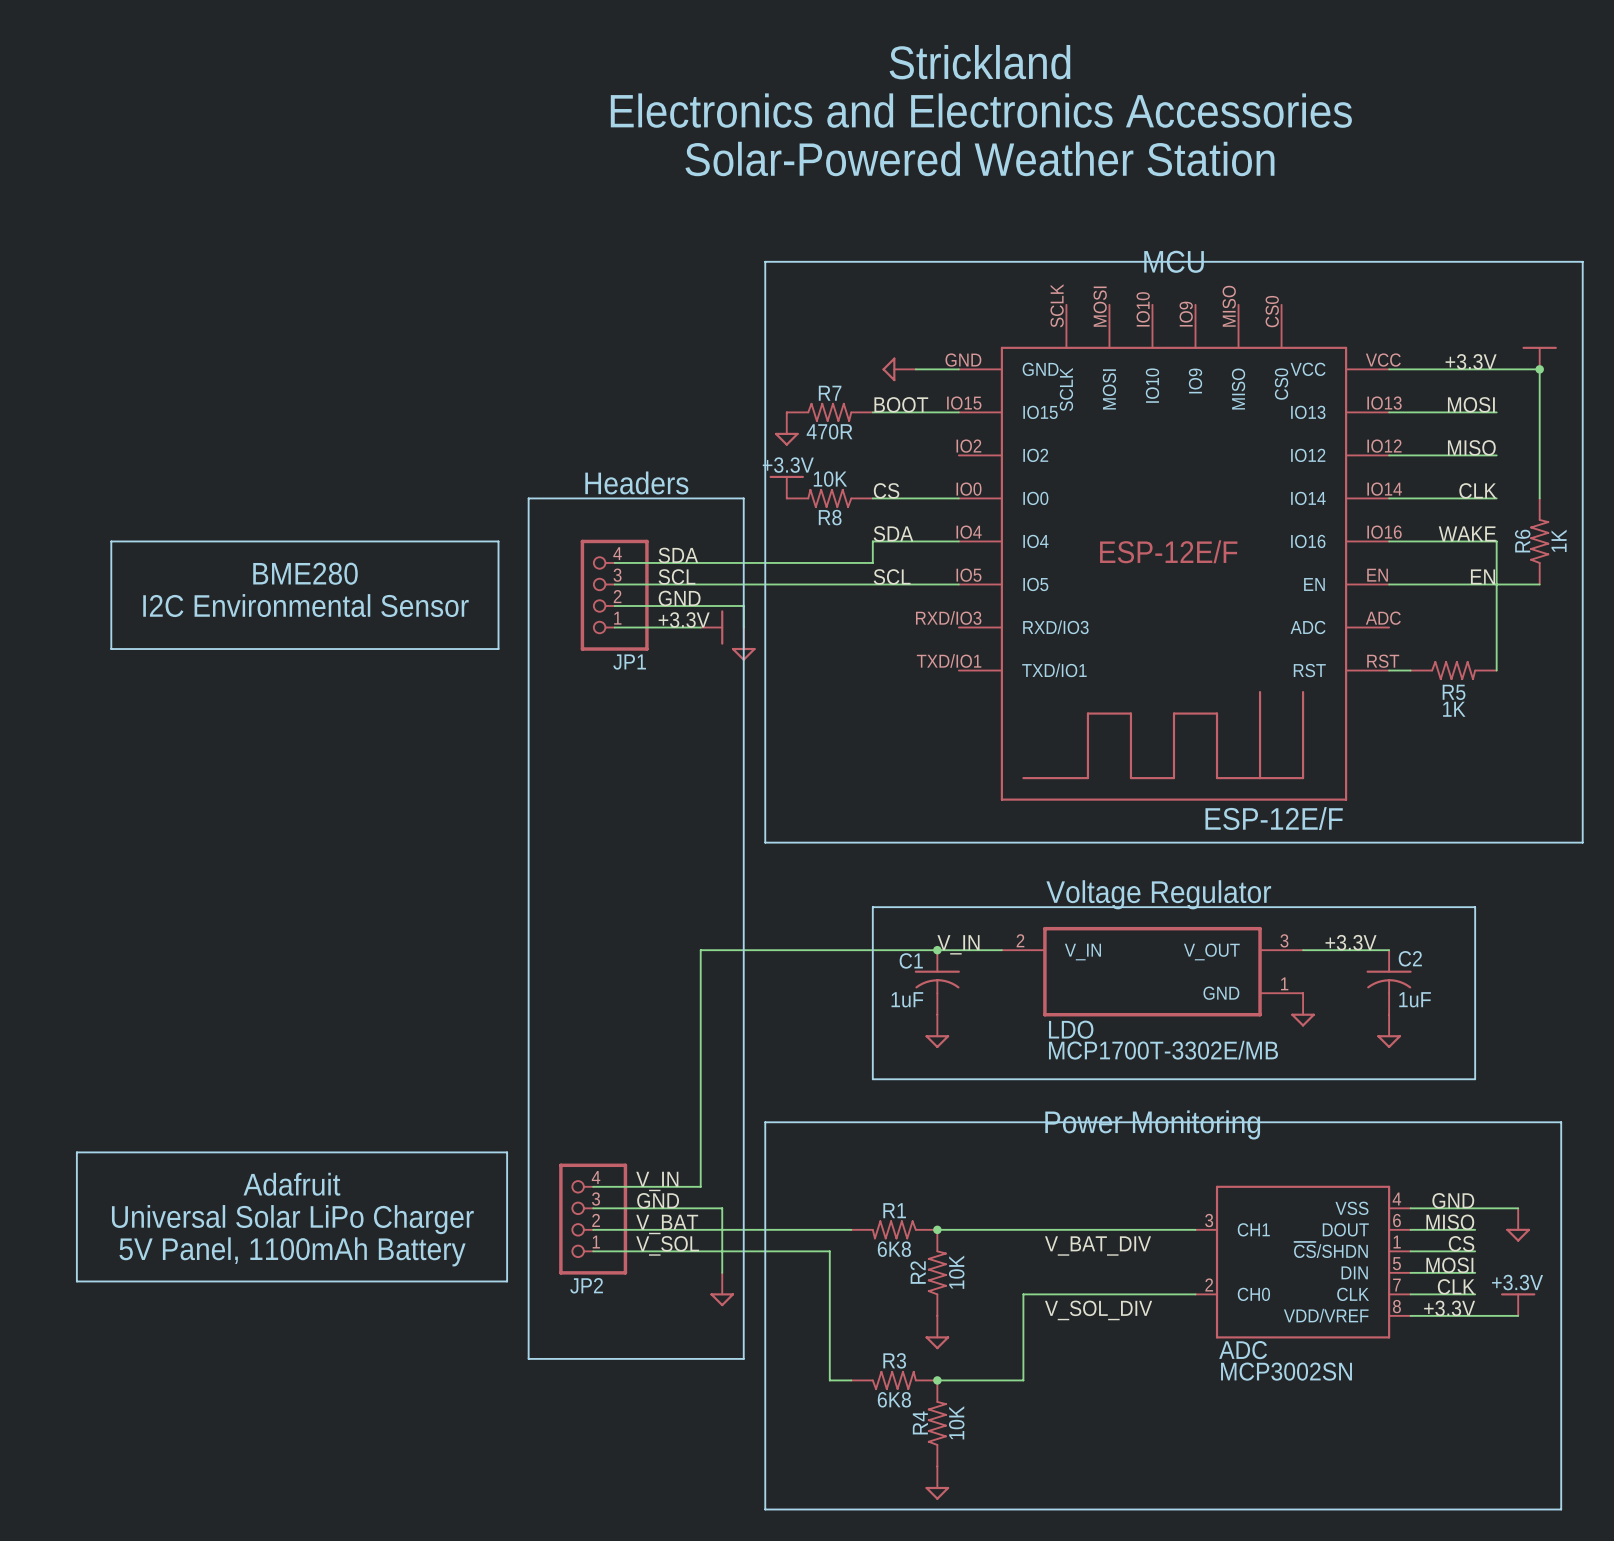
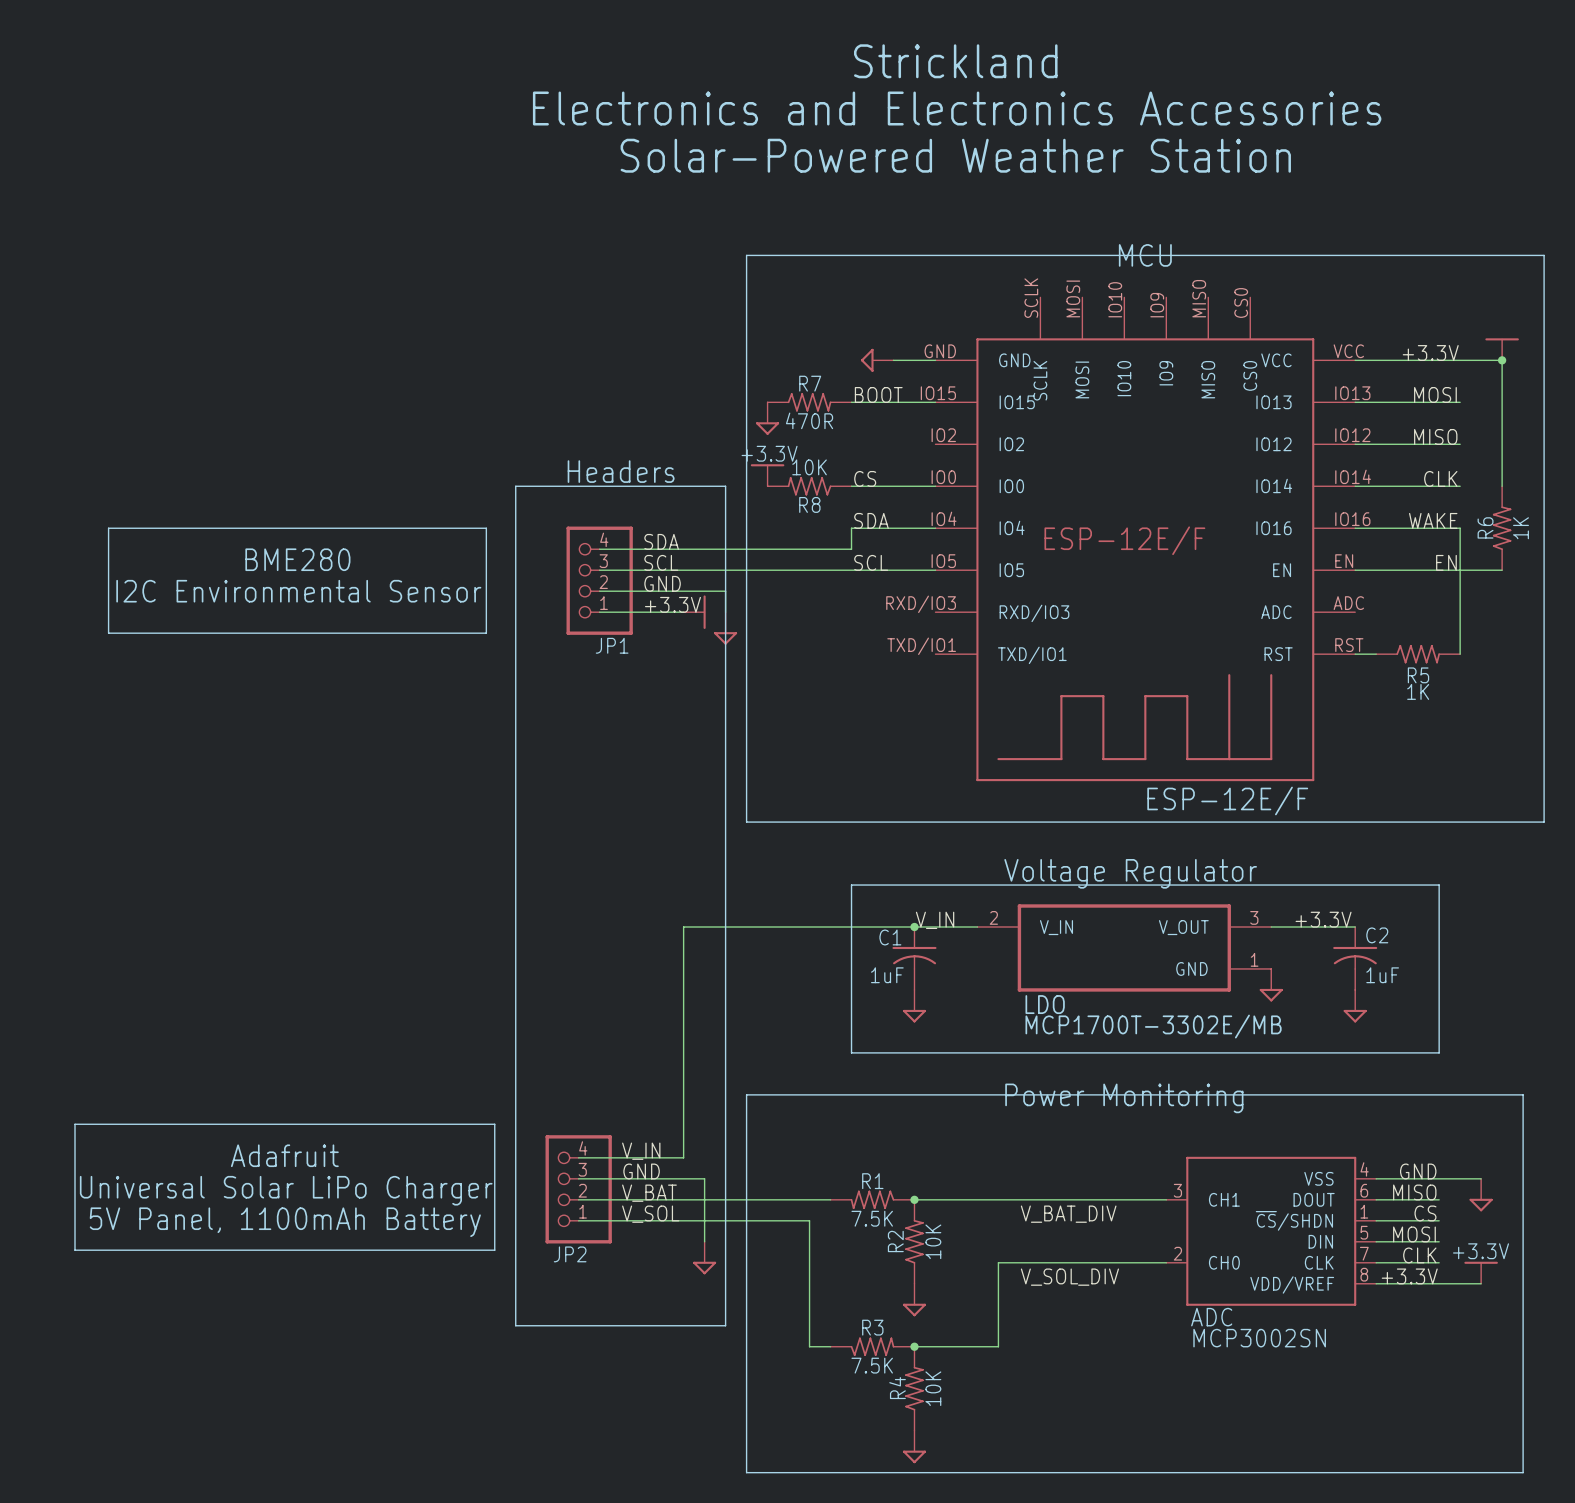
R1 value: 6K8 (894, 1249) -> 7.5K (872, 1218)
R3 value: 6K8 (894, 1399) -> 7.5K (872, 1365)

